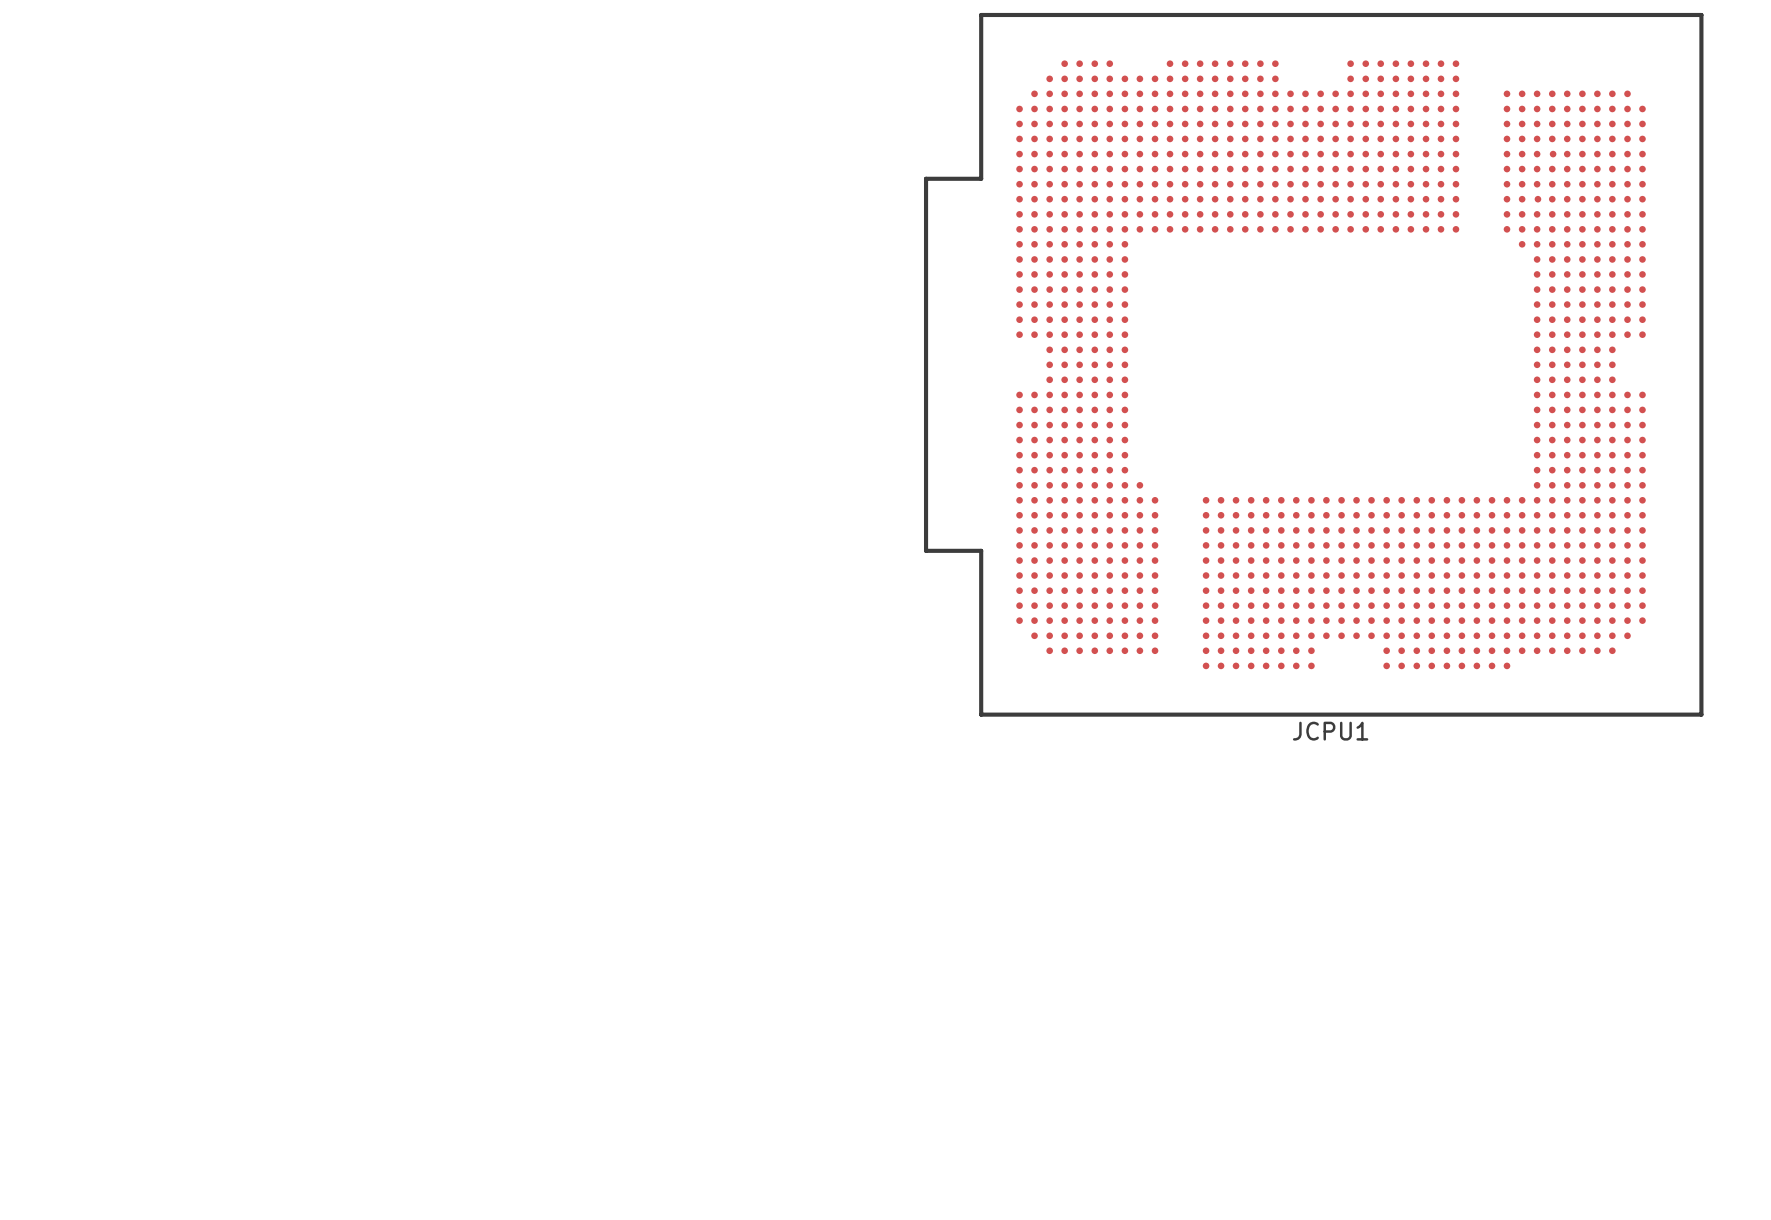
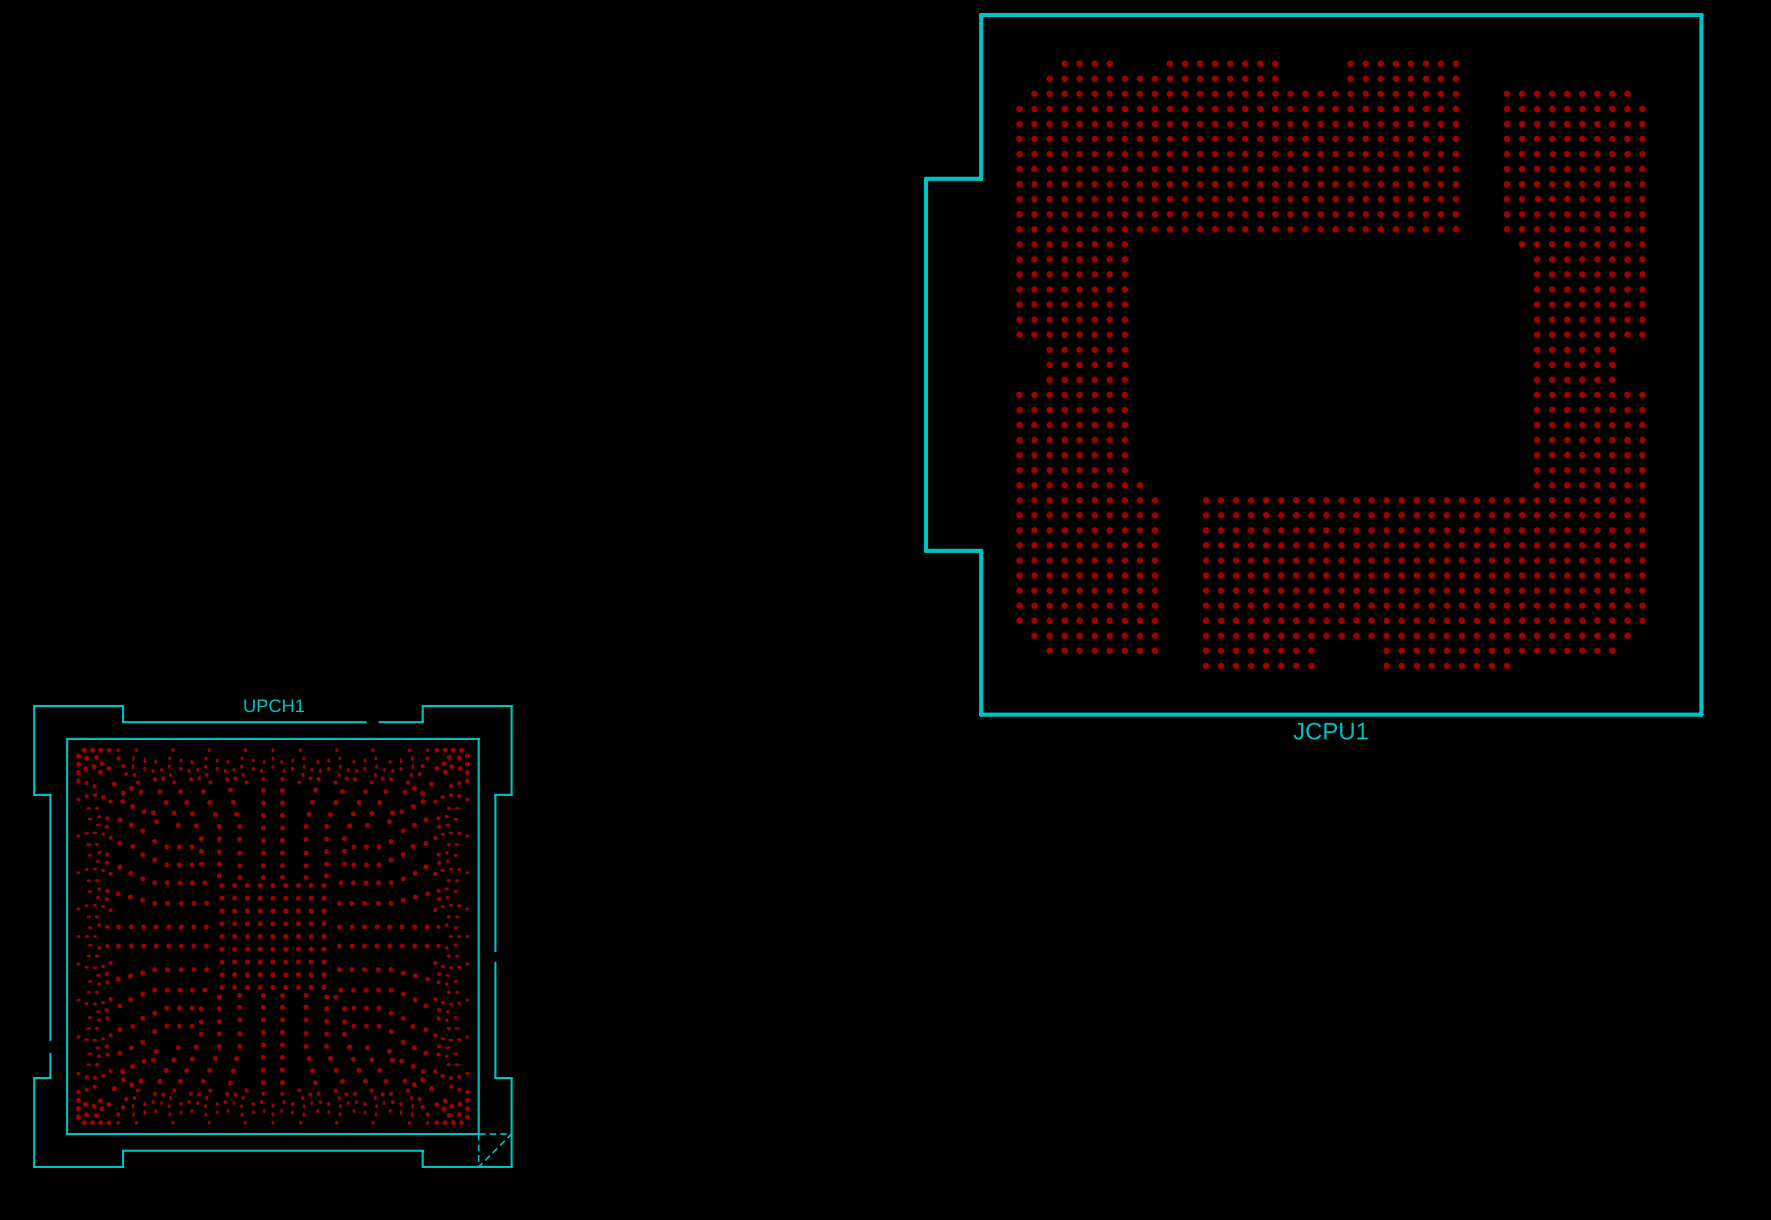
UPCH1: none -> (272, 936)

